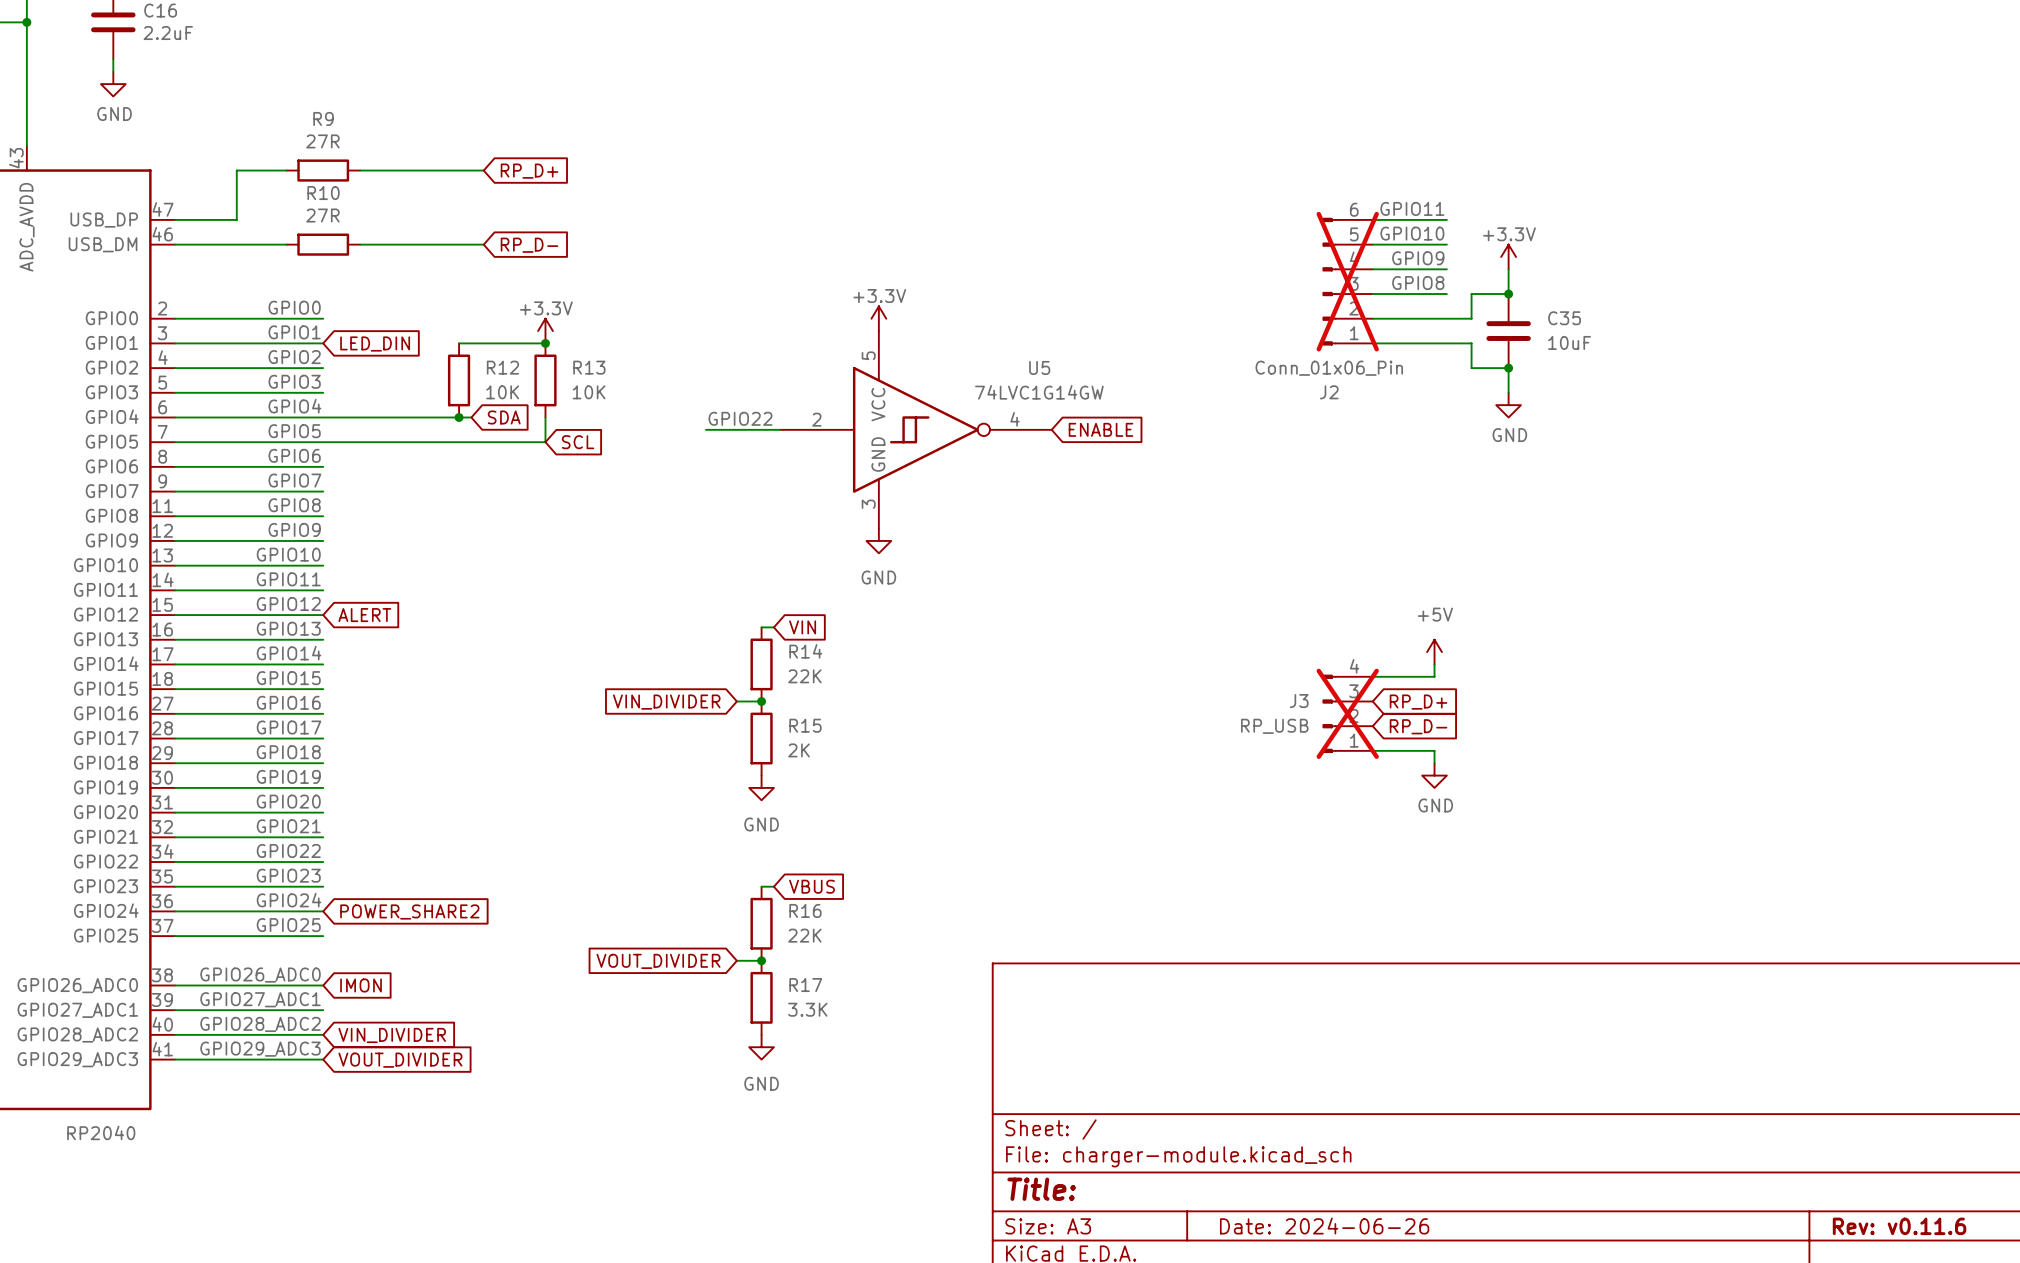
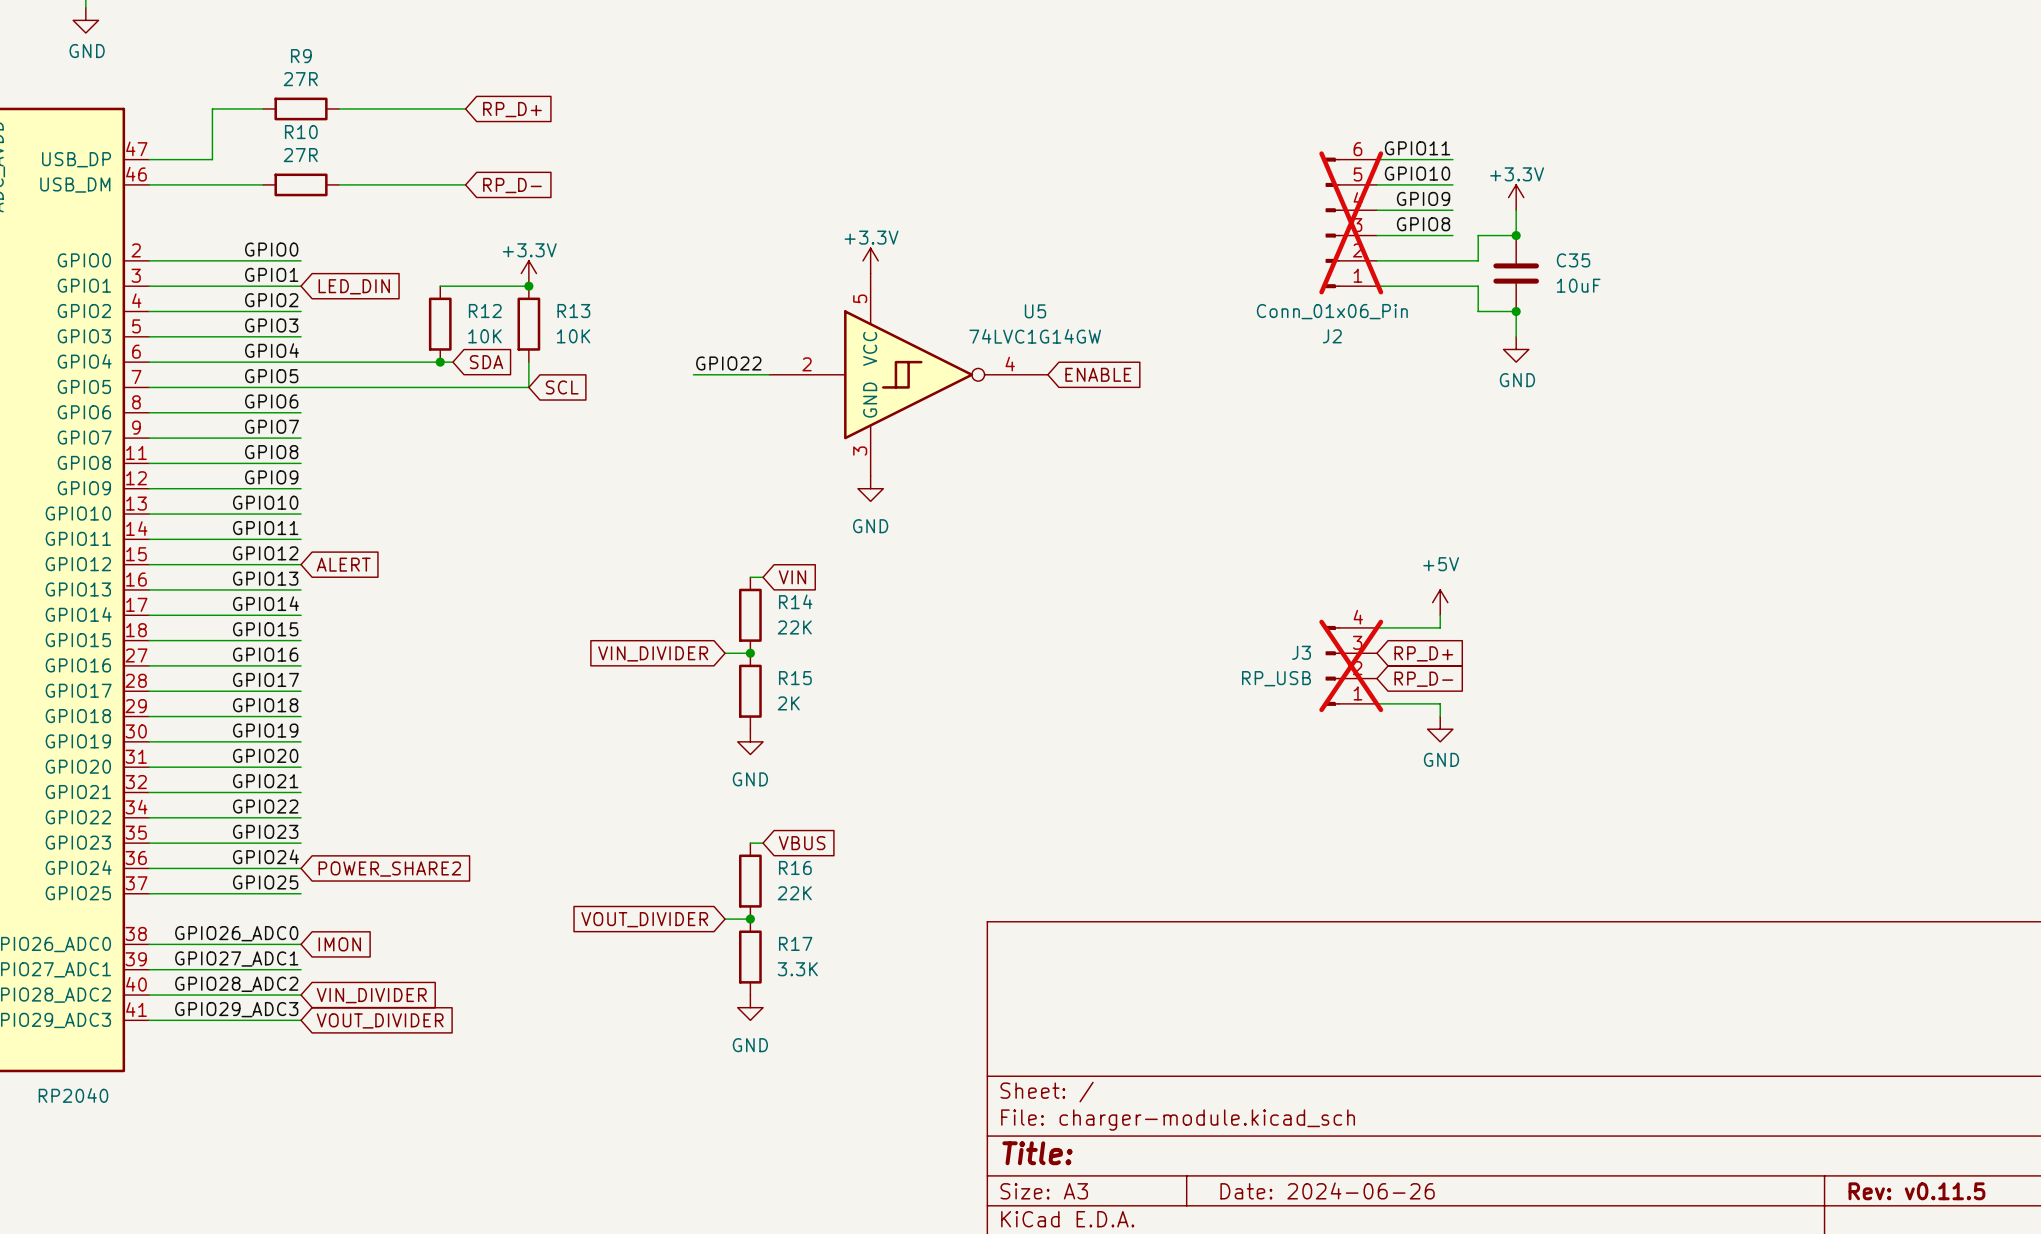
title block: Rev: v0.11.6 (1899, 1226) -> Rev: v0.11.5 (1916, 1191)

